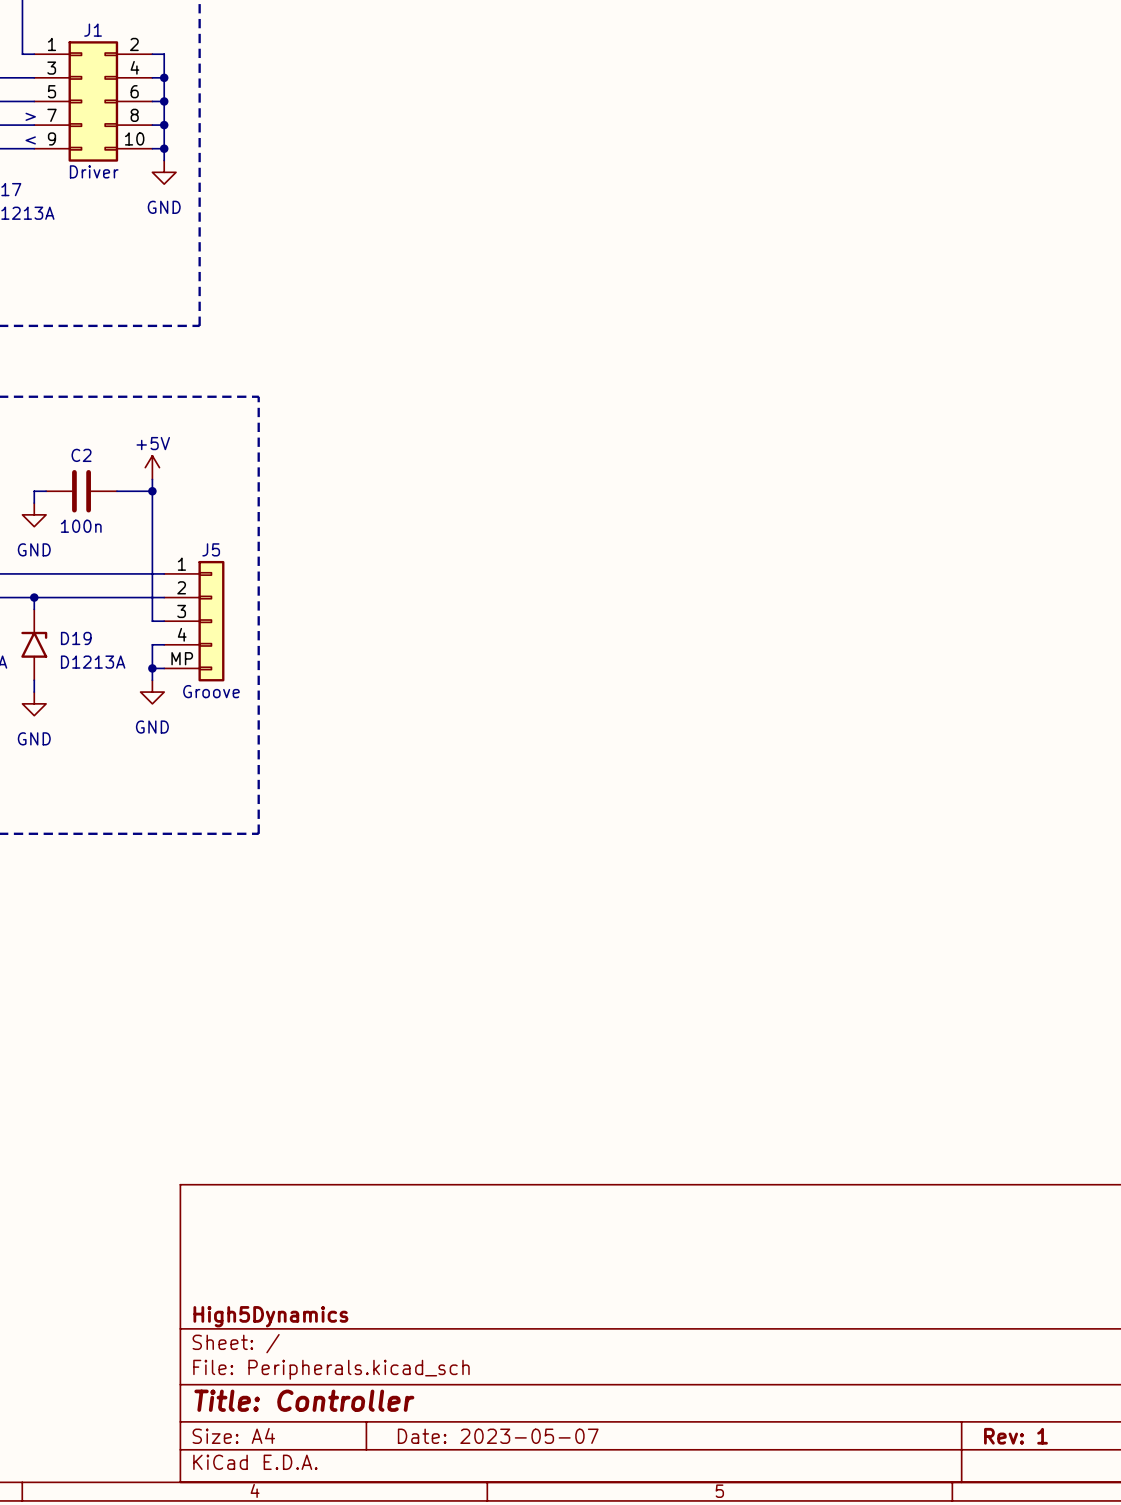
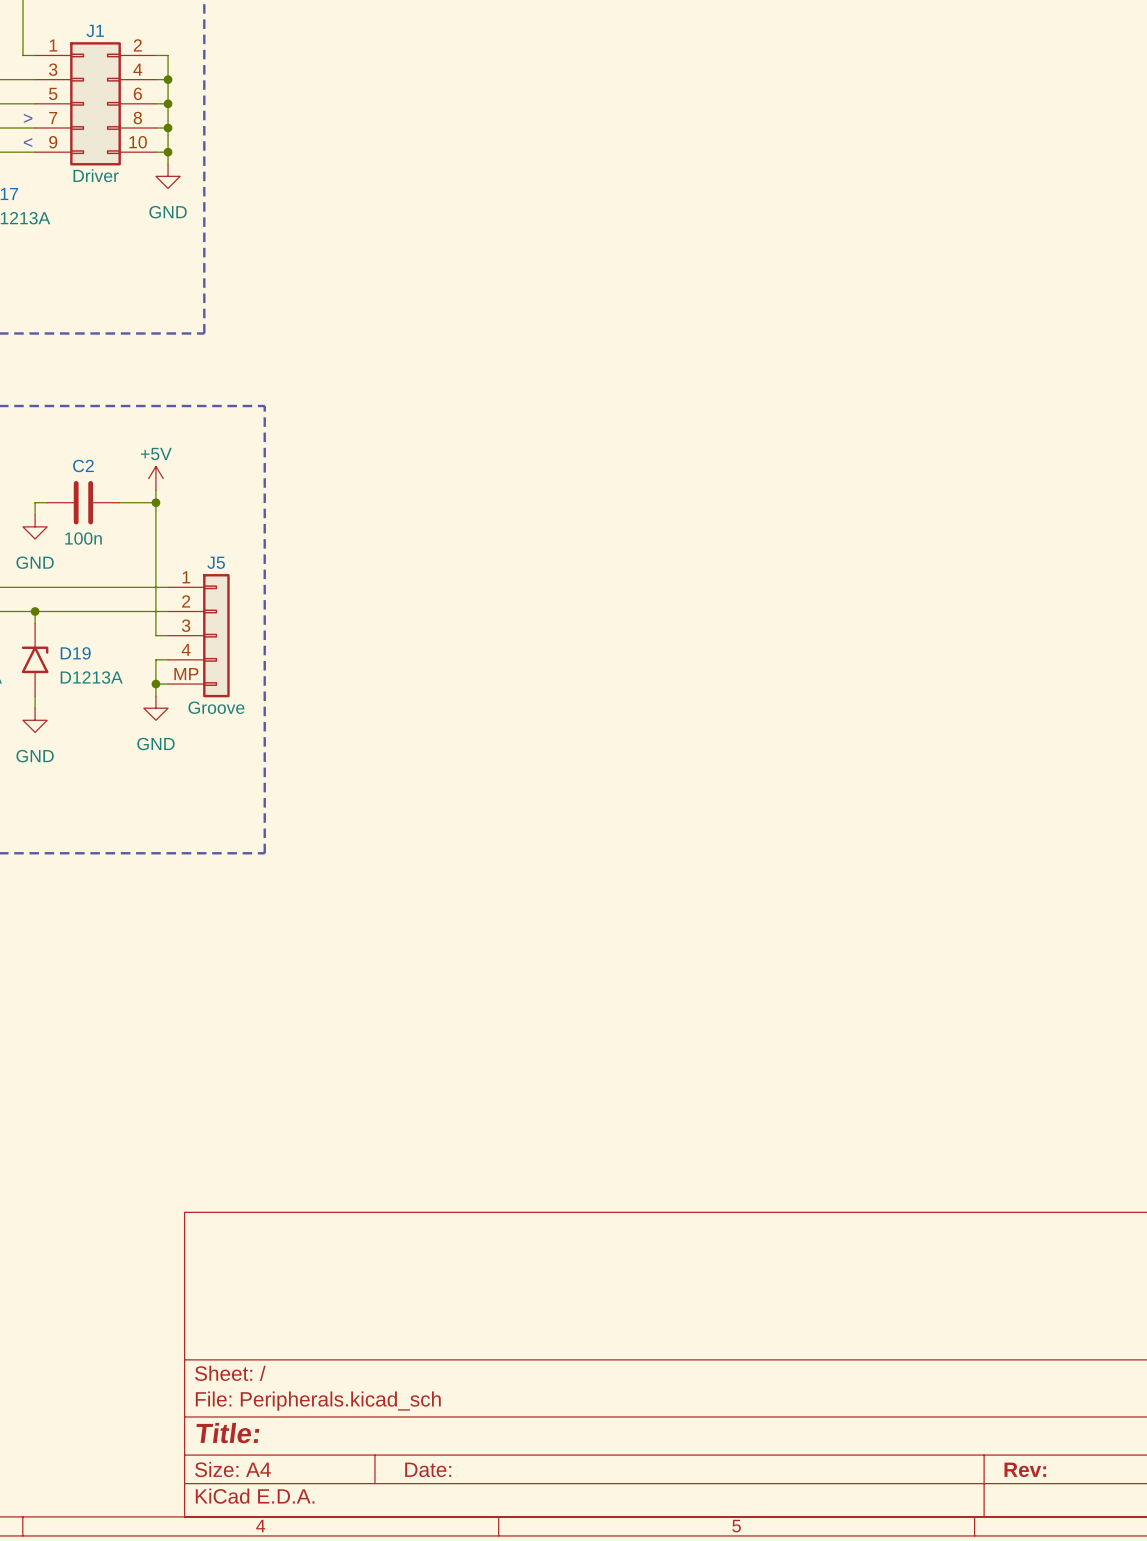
title block: High5Dynamics (270, 1316) -> none
title block: Title: Controller (304, 1400) -> Title: (227, 1433)
title block: Date: 2023-05-07 (498, 1436) -> Date: (428, 1469)
title block: Rev: 1 (1015, 1436) -> Rev: (1025, 1469)

